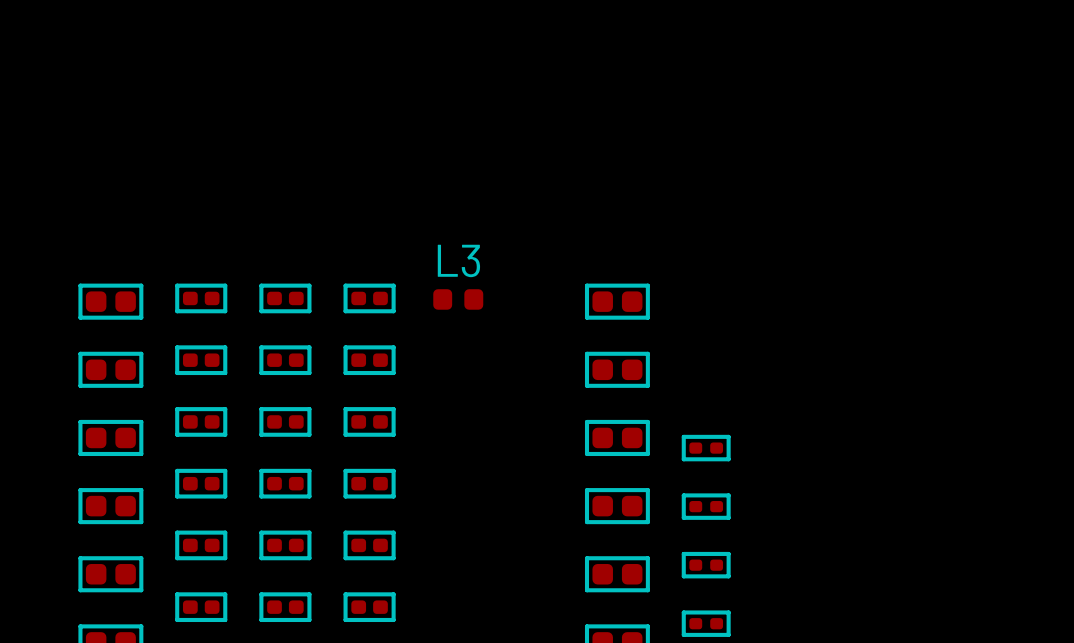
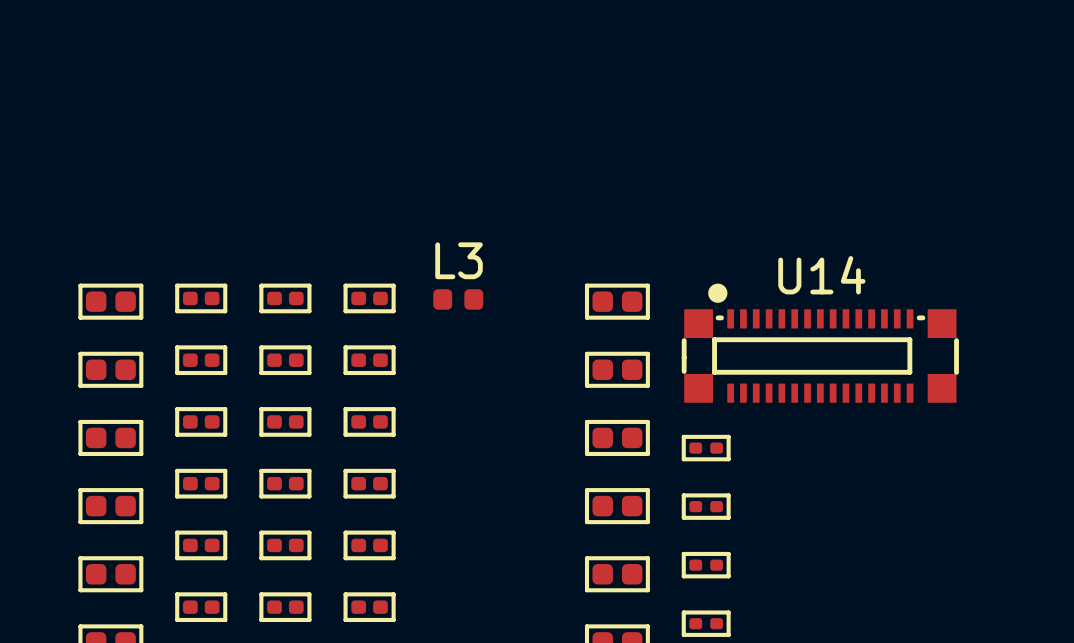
U14: none -> (820, 343)

